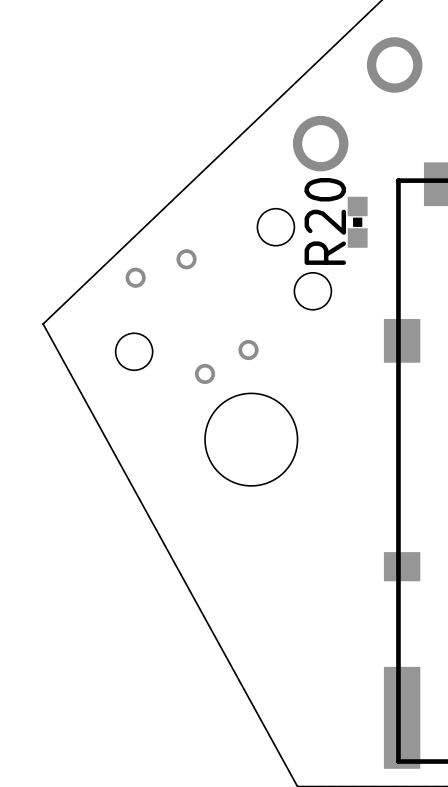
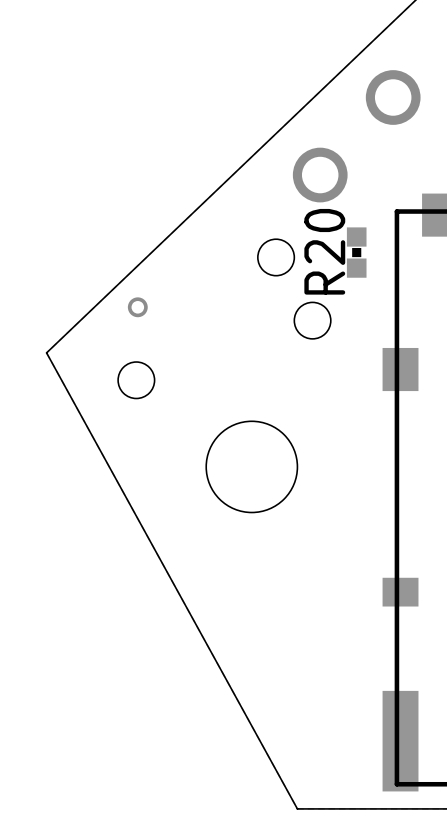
via: (186, 259) -> none
via: (248, 350) -> none
via: (205, 373) -> none

